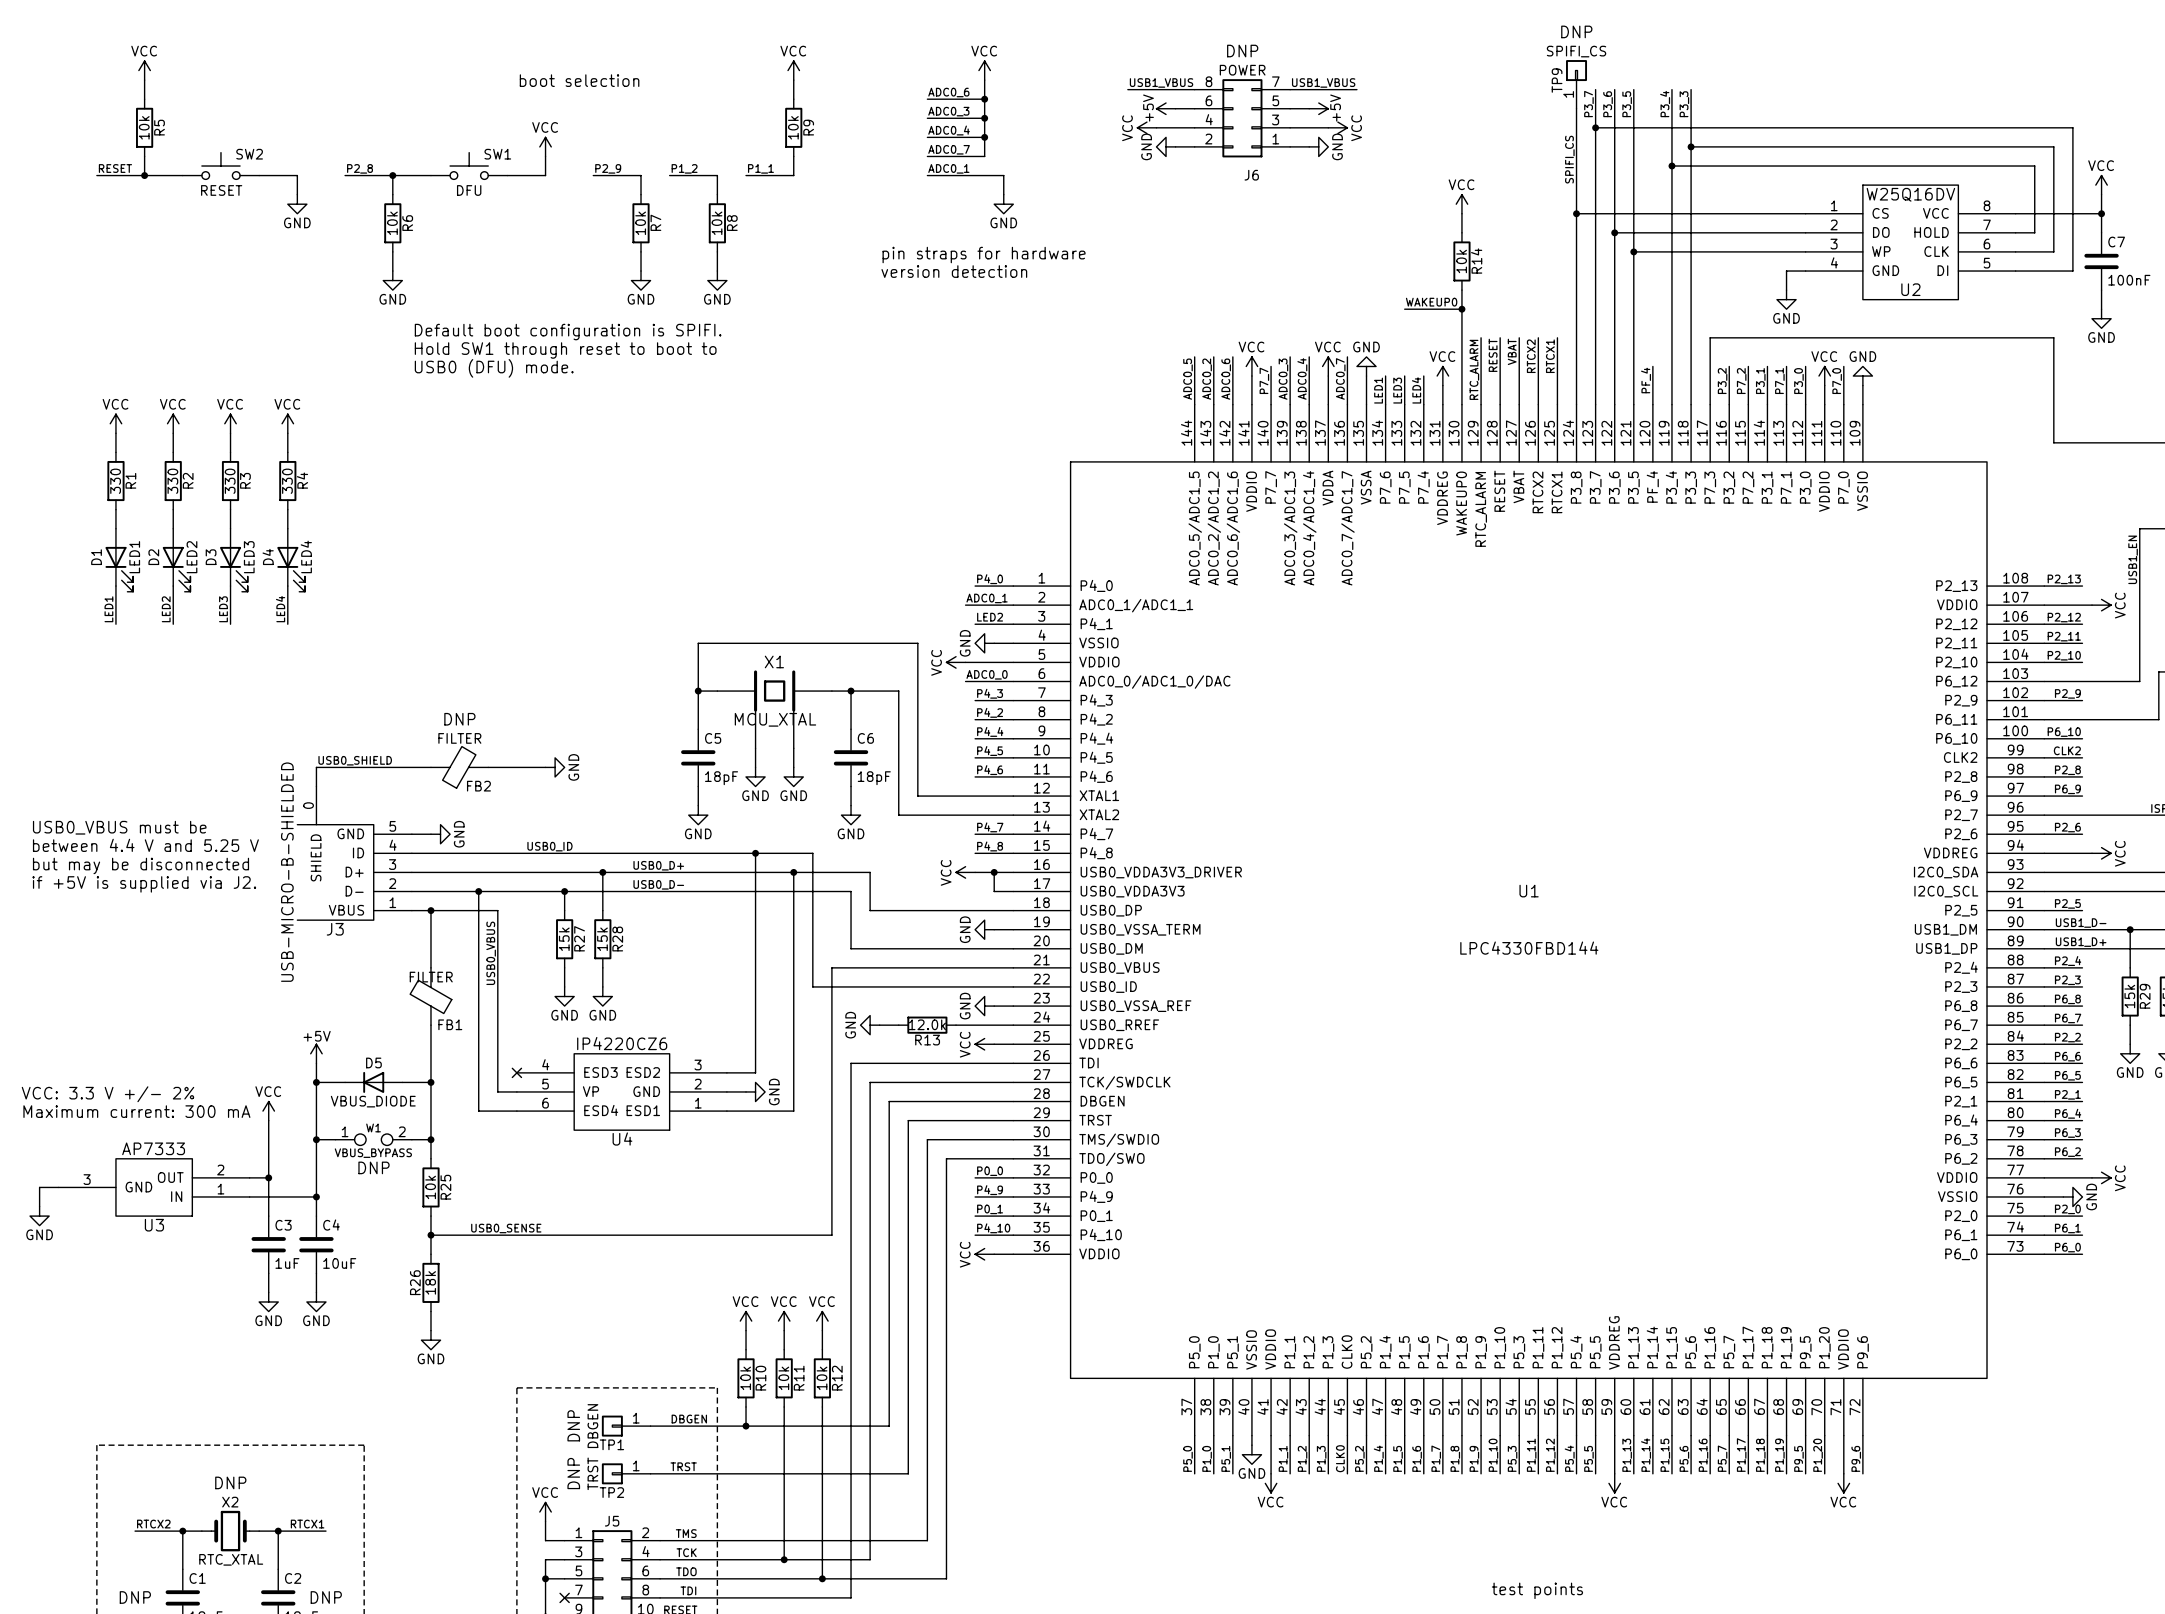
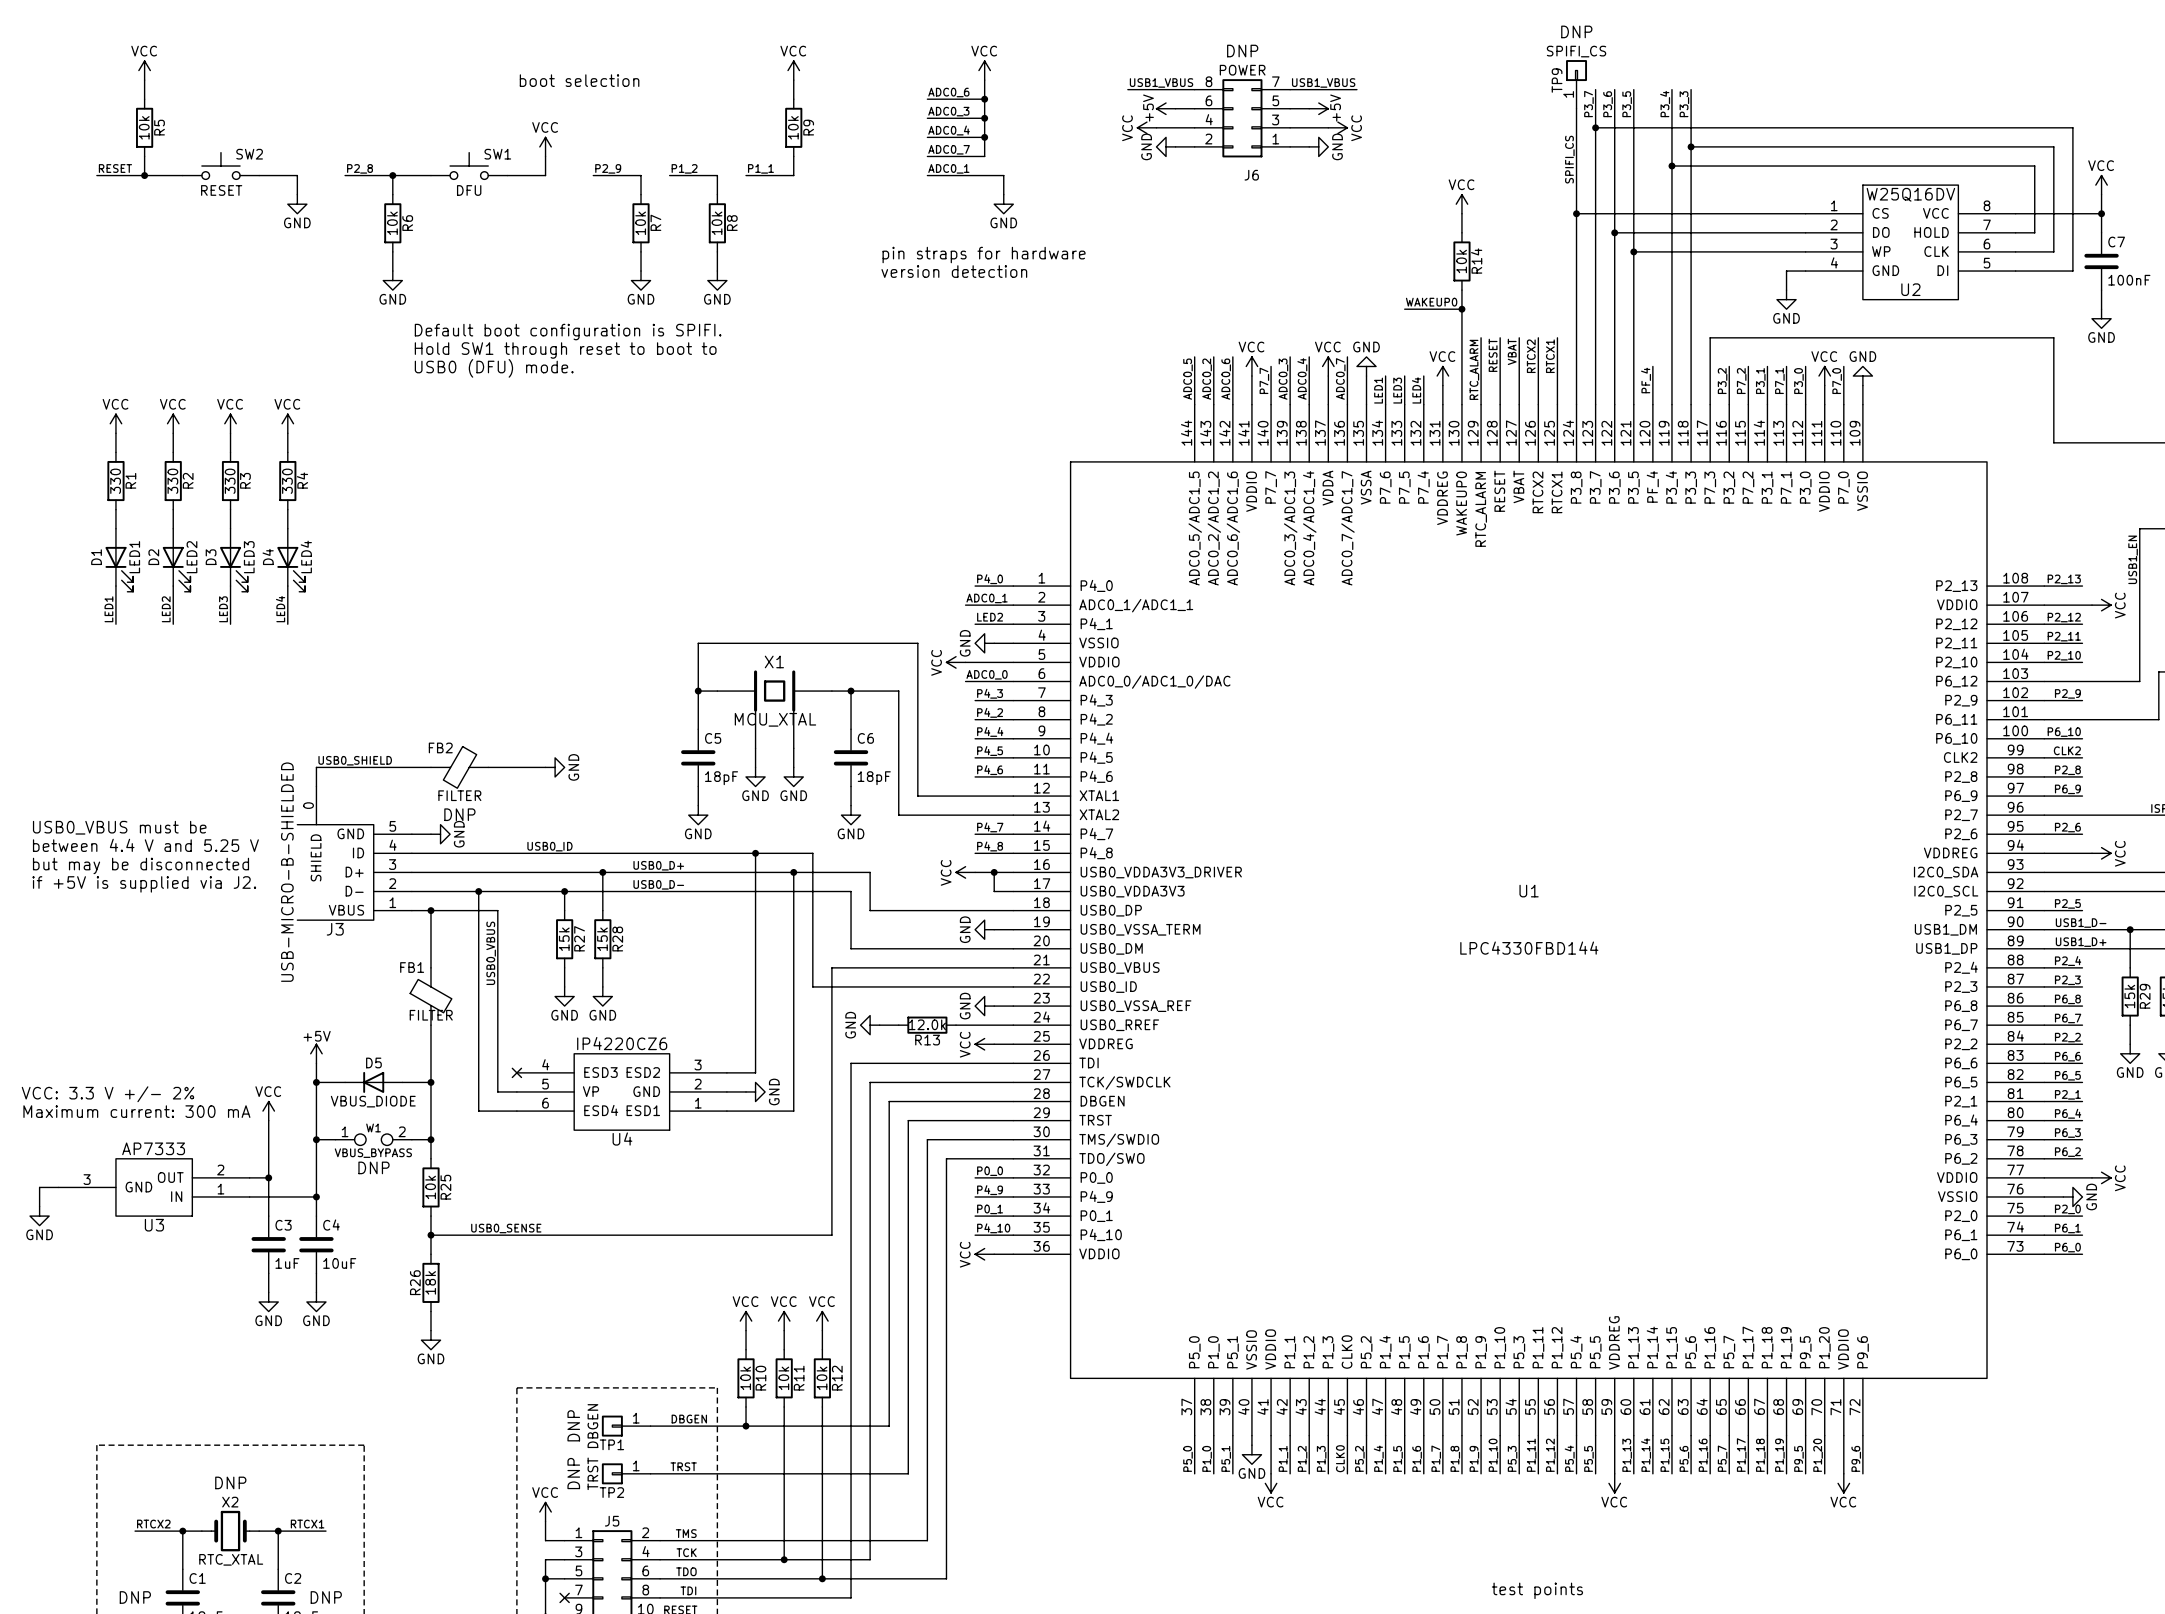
FB2 rotation: 0° (459, 767) -> 180° (460, 767)
FB1 rotation: 0° (430, 996) -> 180° (430, 996)

